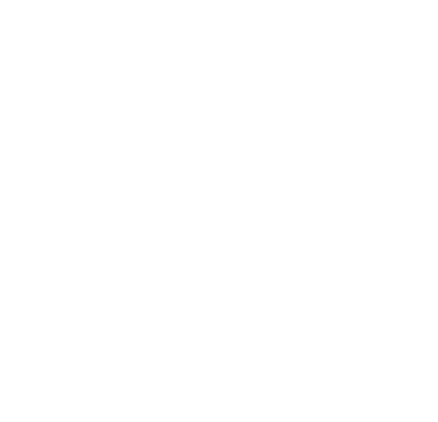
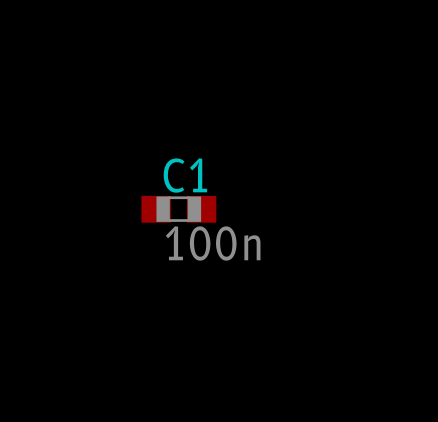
C1: none -> 100n (178, 209)

